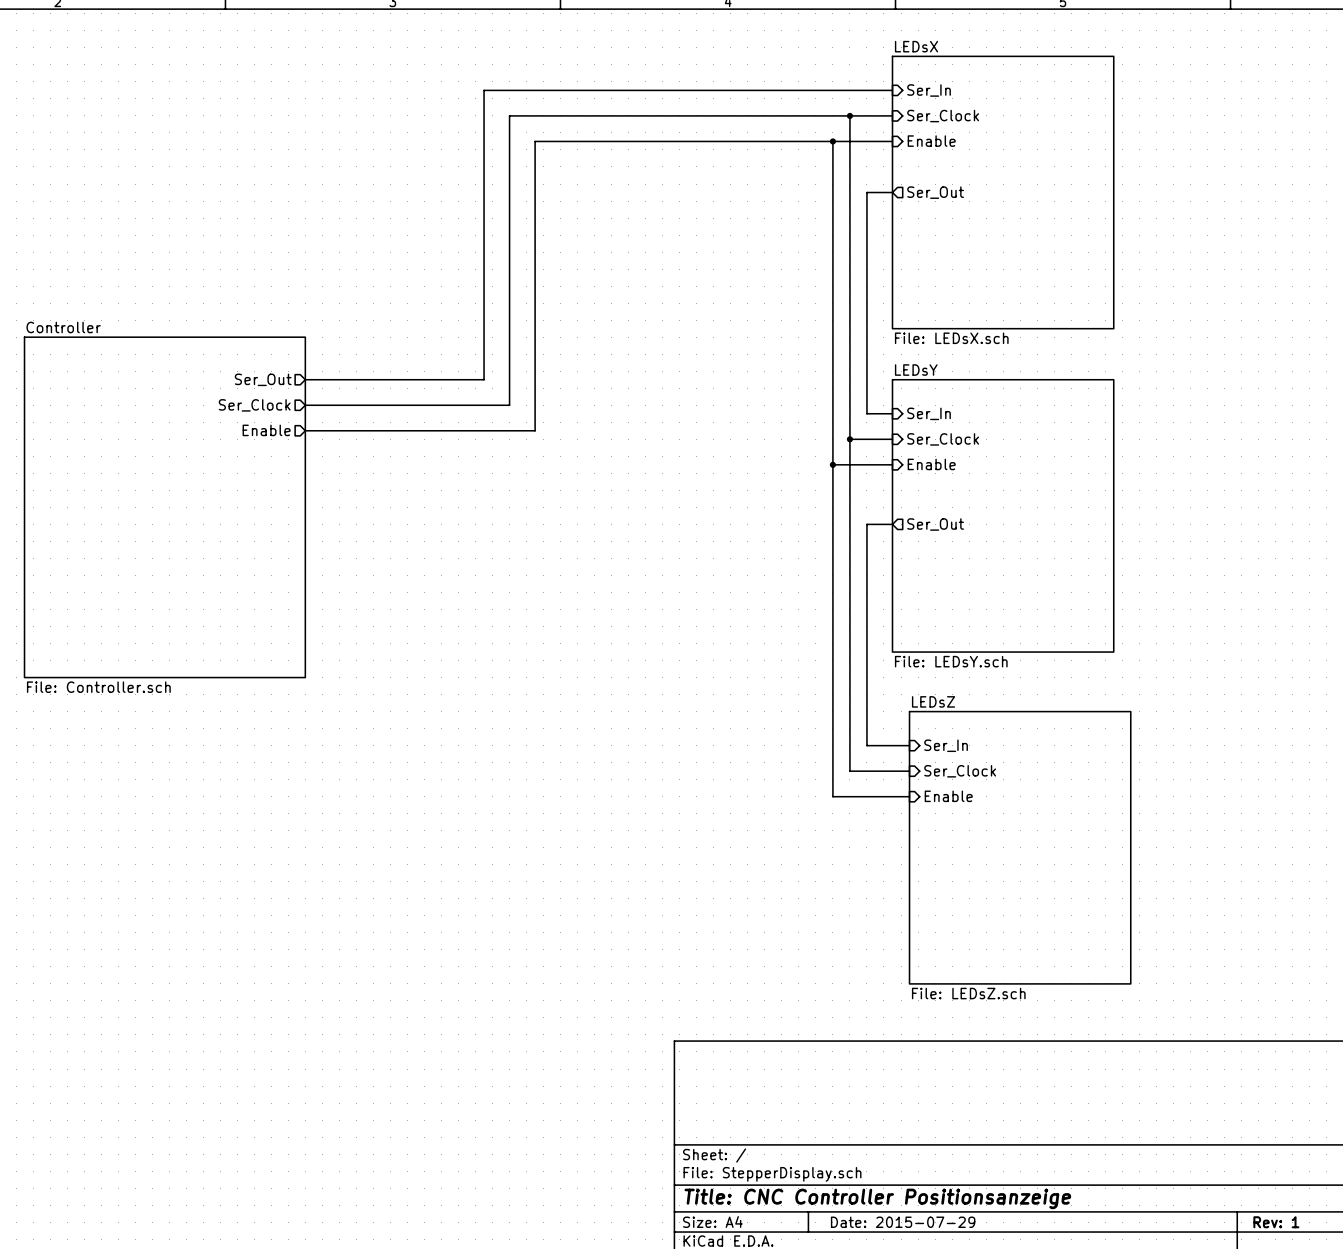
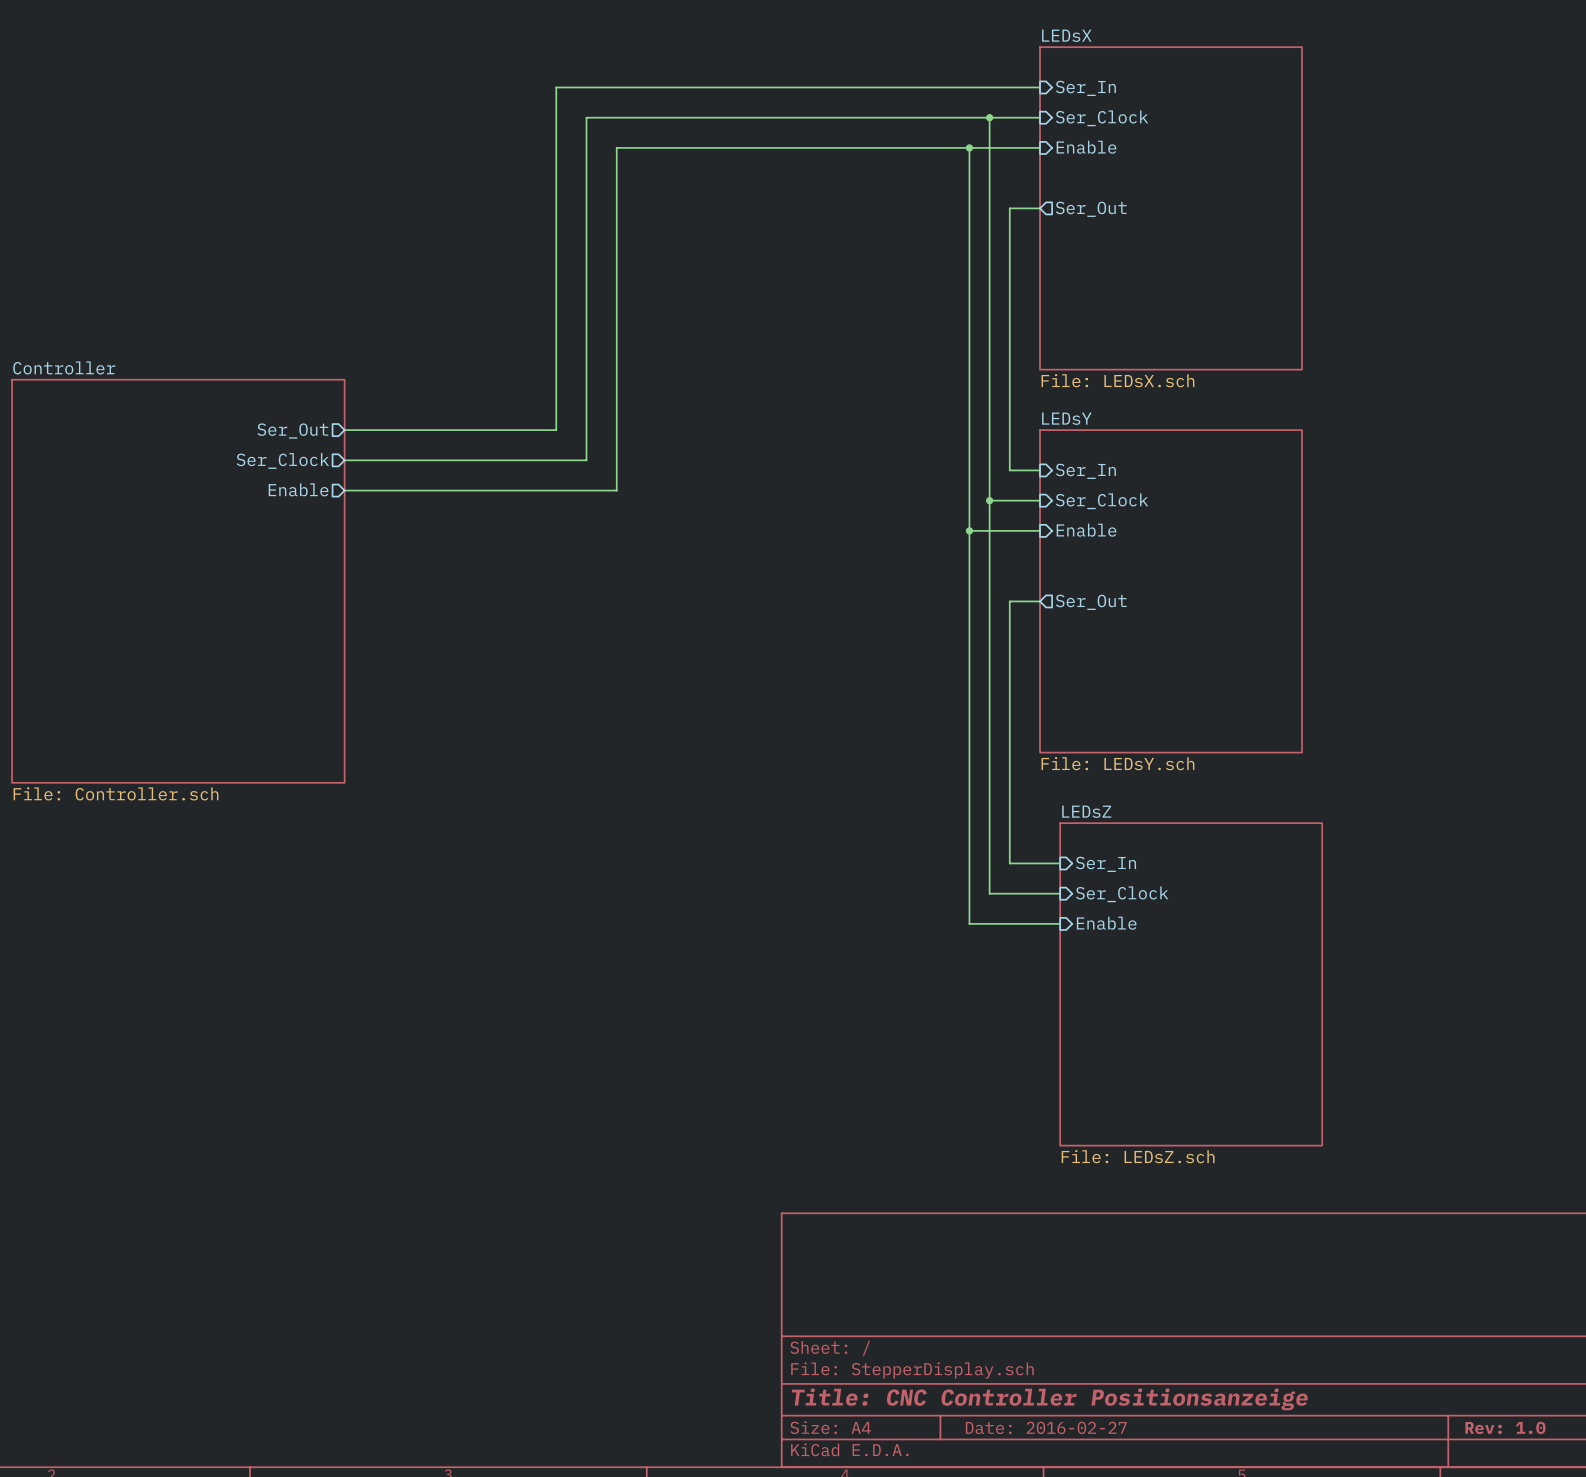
title block: Date: 2015-07-29 (903, 1222) -> Date: 2016-02-27 (1046, 1427)
title block: Rev: 1 (1276, 1222) -> Rev: 1.0 (1505, 1427)

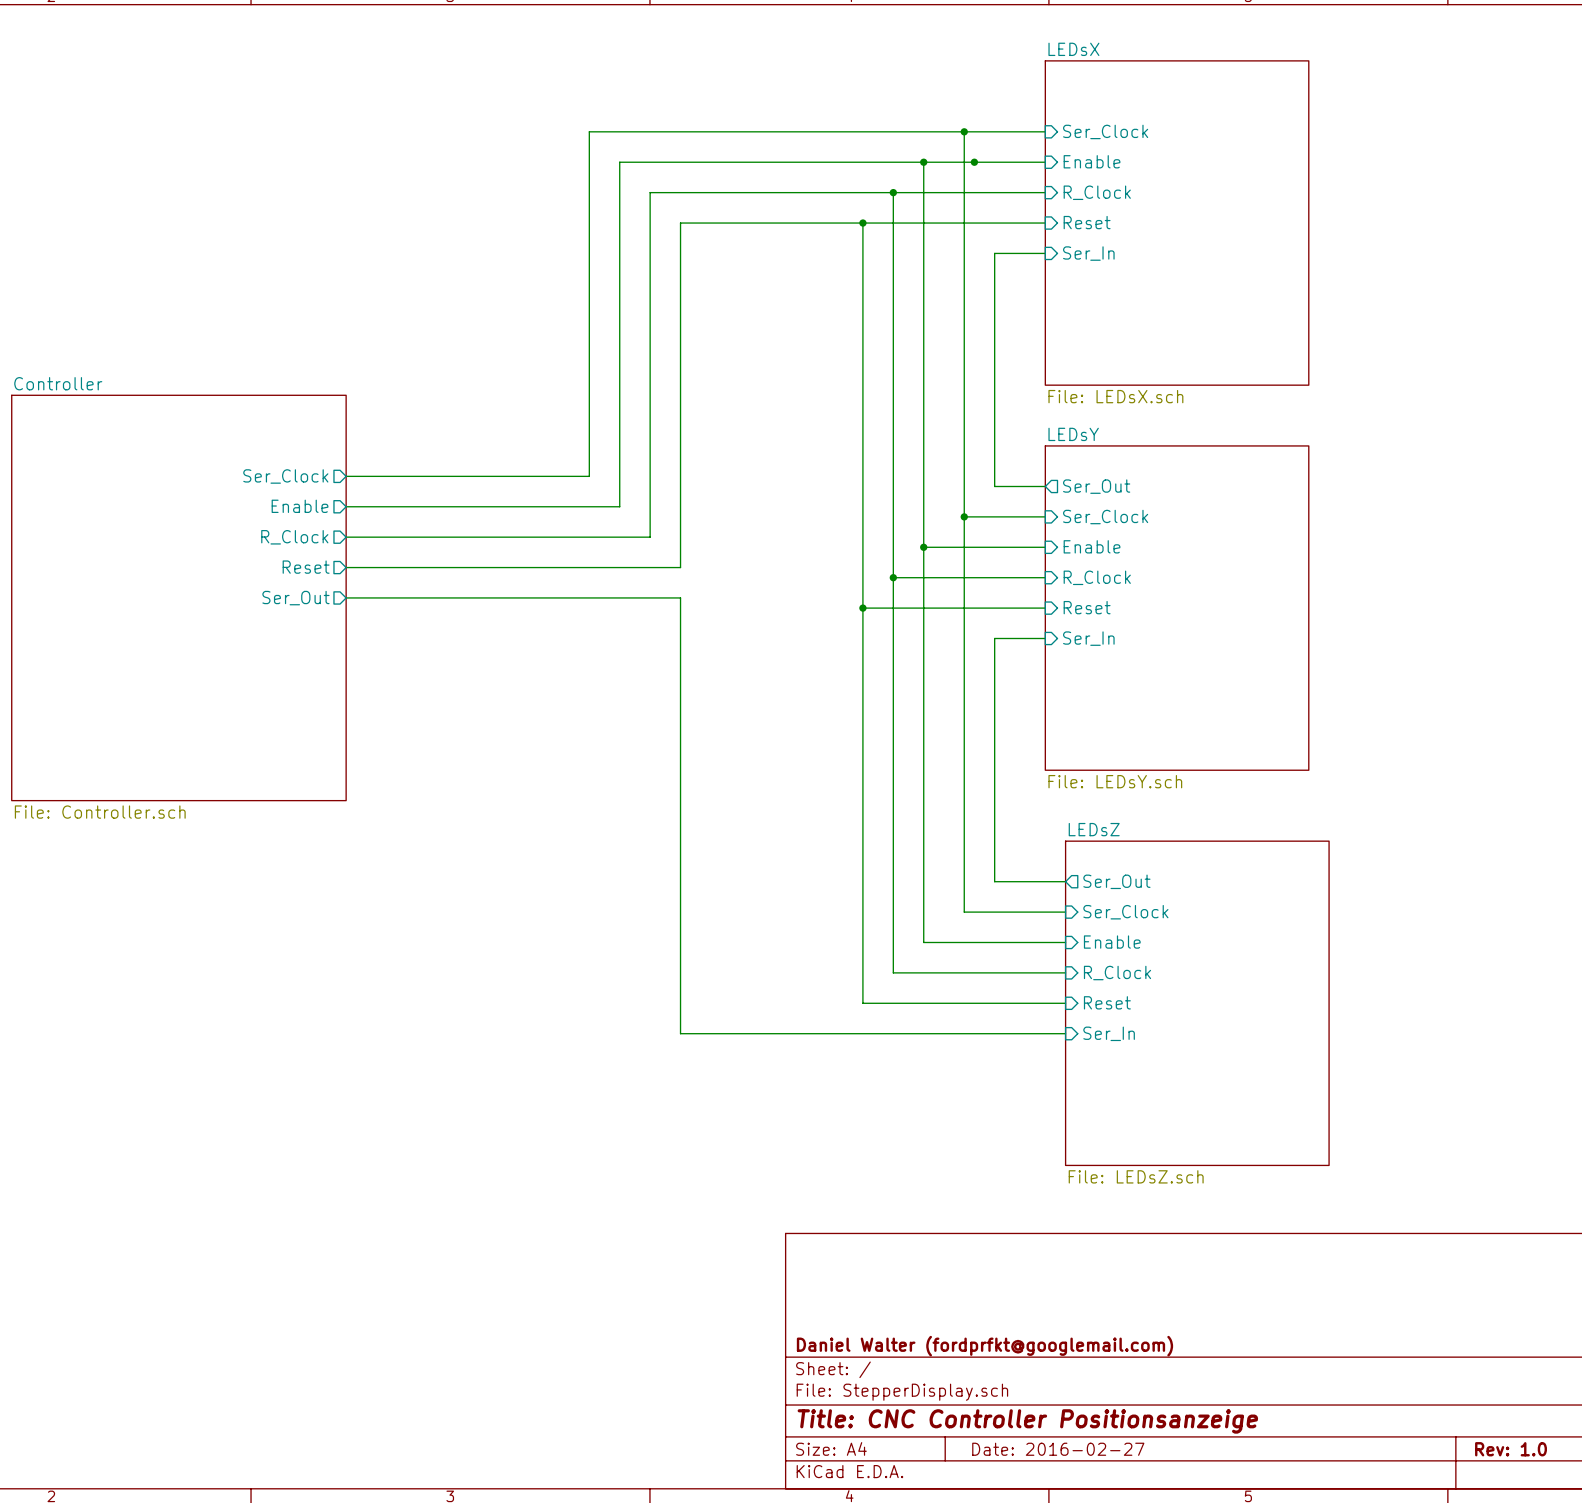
wire: (1040, 87) (556, 87) (556, 430) (344, 430) -> none
sheet pin position: Ser_In (1085, 88) -> Ser_In (1088, 253)
wire: none -> (964, 131) (964, 912) (994, 912)
wire: (989, 117) (989, 238) -> (1045, 253) (994, 253)
junction position: (989, 117) -> (964, 131)
junction: none -> (923, 162)
wire: (969, 147) (969, 923) -> (923, 162) (923, 942) (974, 942)
wire: none -> (893, 192) (893, 972) (1065, 972)
junction: none -> (893, 192)
wire: none -> (1045, 192) (650, 192) (650, 537) (346, 537)
sheet pin: none -> R_Clock (1097, 192)
wire: none -> (862, 223) (862, 1003) (1065, 1003)
junction: none -> (862, 223)
wire: (1009, 208) (1009, 470) -> (1014, 223) (680, 223) (680, 567) (346, 567)
sheet pin shape: output (1091, 209) -> input (1087, 222)
sheet pin: Ser_Out (1091, 209) -> Reset (1087, 222)
sheet pin position: Ser_Out (292, 431) -> Ser_Out (295, 598)
wire: (989, 470) (989, 621) -> (994, 486) (1014, 486)
sheet pin shape: input (1085, 471) -> output (1096, 486)
sheet pin: Ser_In (1085, 471) -> Ser_Out (1096, 486)
wire: none -> (964, 516) (994, 516)
junction: none -> (964, 516)
junction: (989, 500) -> none
sheet pin: none -> R_Clock (294, 537)
wire: none -> (923, 547) (974, 547)
junction: none -> (923, 547)
junction: (969, 530) -> none
sheet pin: none -> Reset (306, 567)
wire: none -> (893, 577) (1045, 577)
junction: none -> (893, 577)
sheet pin: none -> R_Clock (1097, 577)
wire: none -> (346, 597) (680, 597) (680, 1033) (1065, 1033)
wire: none -> (862, 608) (1045, 608)
junction: none -> (862, 608)
sheet pin: none -> Reset (1087, 607)
wire: (1040, 601) (1009, 601) (1009, 863) -> none
sheet pin shape: output (1091, 602) -> input (1088, 638)
sheet pin: Ser_Out (1091, 602) -> Ser_In (1088, 638)
wire: none -> (994, 638) (1045, 638)
wire: (989, 863) (989, 893) -> (994, 881) (1014, 881)
sheet pin shape: input (1106, 864) -> output (1116, 881)
sheet pin: Ser_In (1106, 864) -> Ser_Out (1116, 881)
sheet pin: none -> R_Clock (1117, 973)
sheet pin: none -> Reset (1107, 1002)
sheet pin: none -> Ser_In (1109, 1033)
title block: none -> Daniel Walter (fordprfkt@googlemail.com) (984, 1346)

